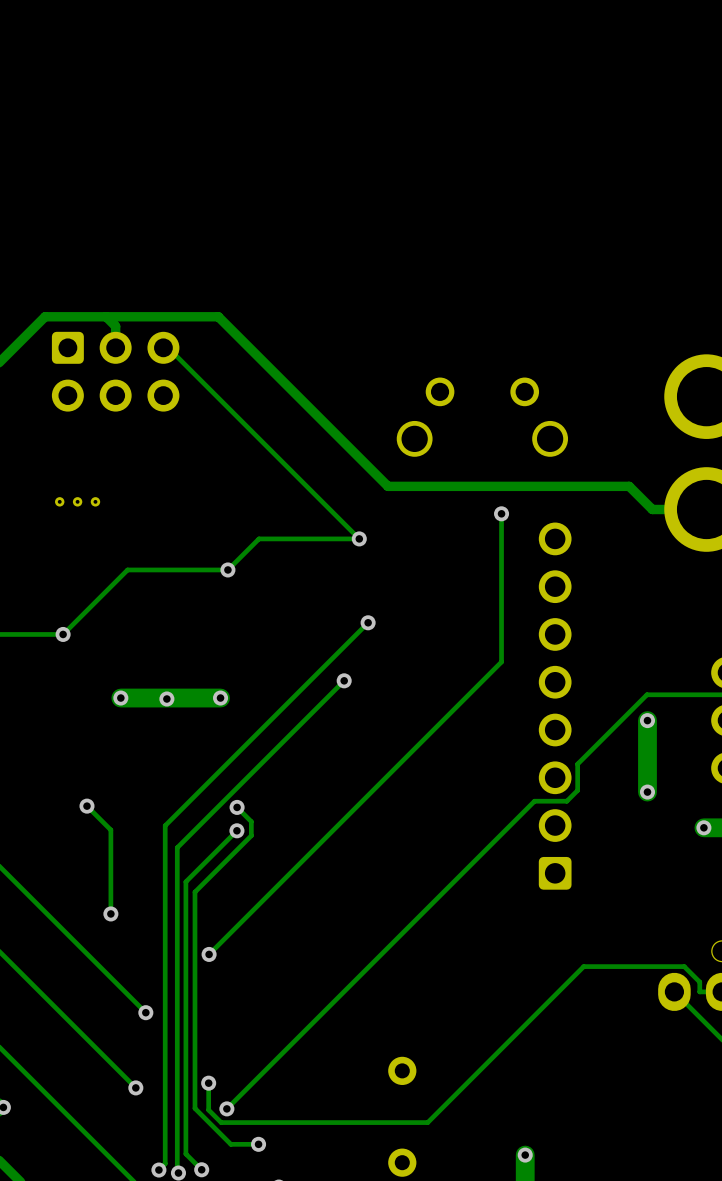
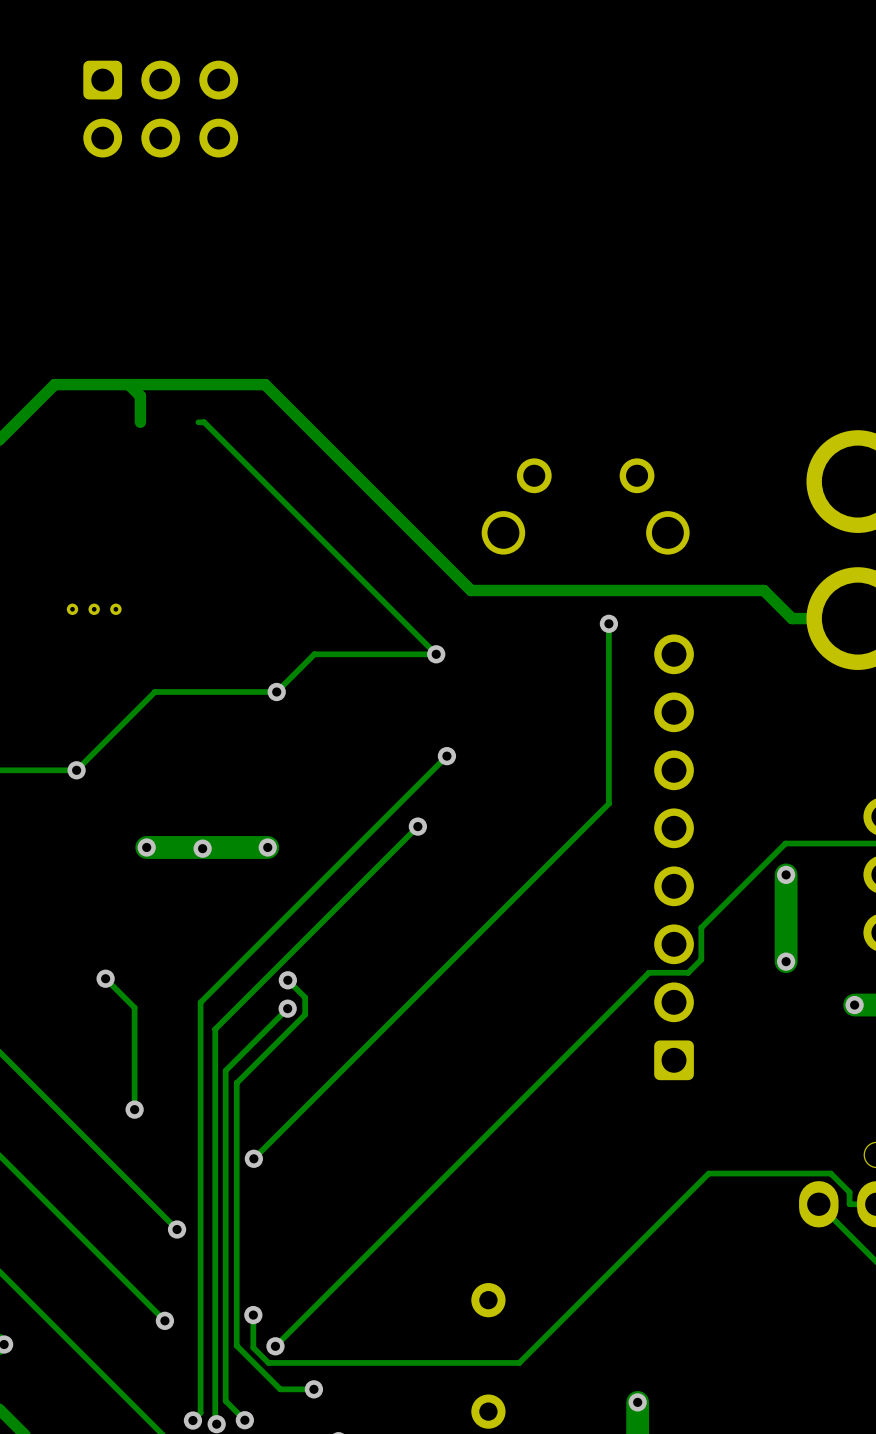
part position: (115, 371) -> (160, 109)

